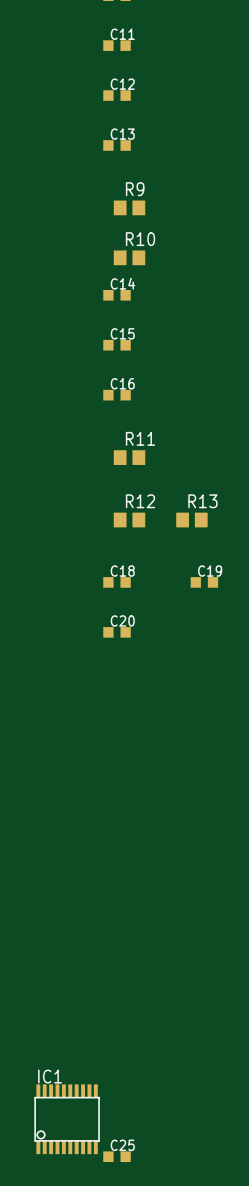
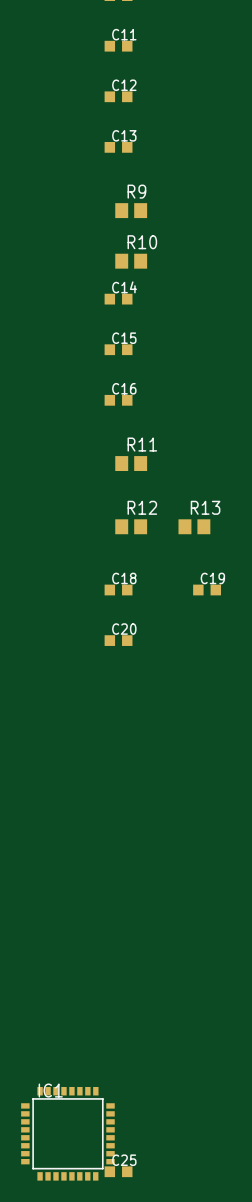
IC1 footprint: [34, 1084, 100, 1155] -> [21, 1087, 115, 1181]

